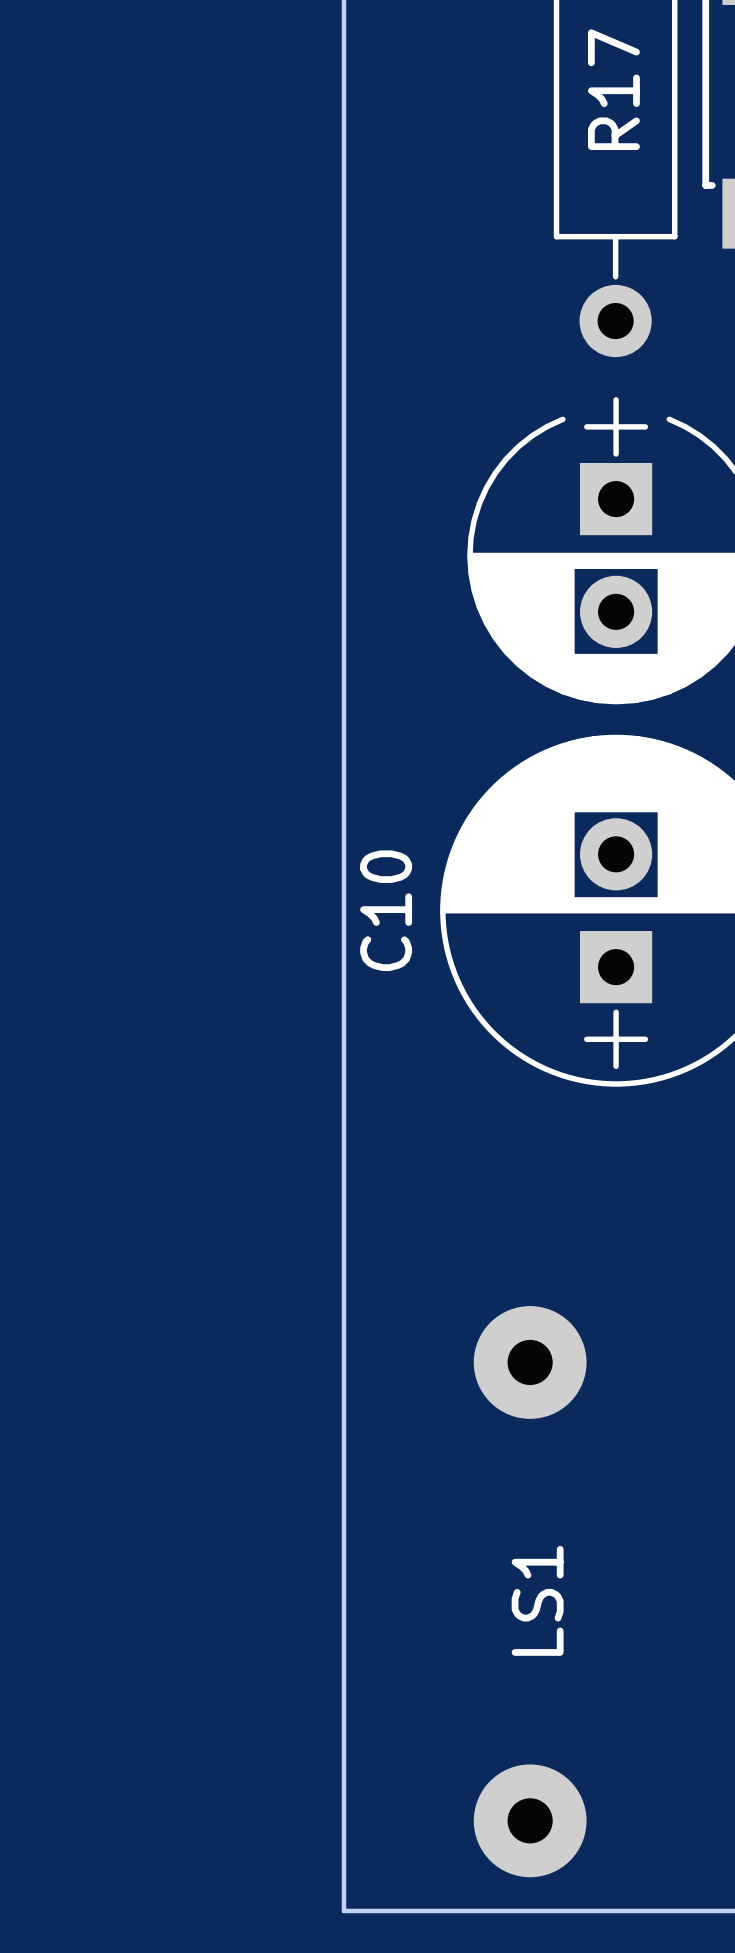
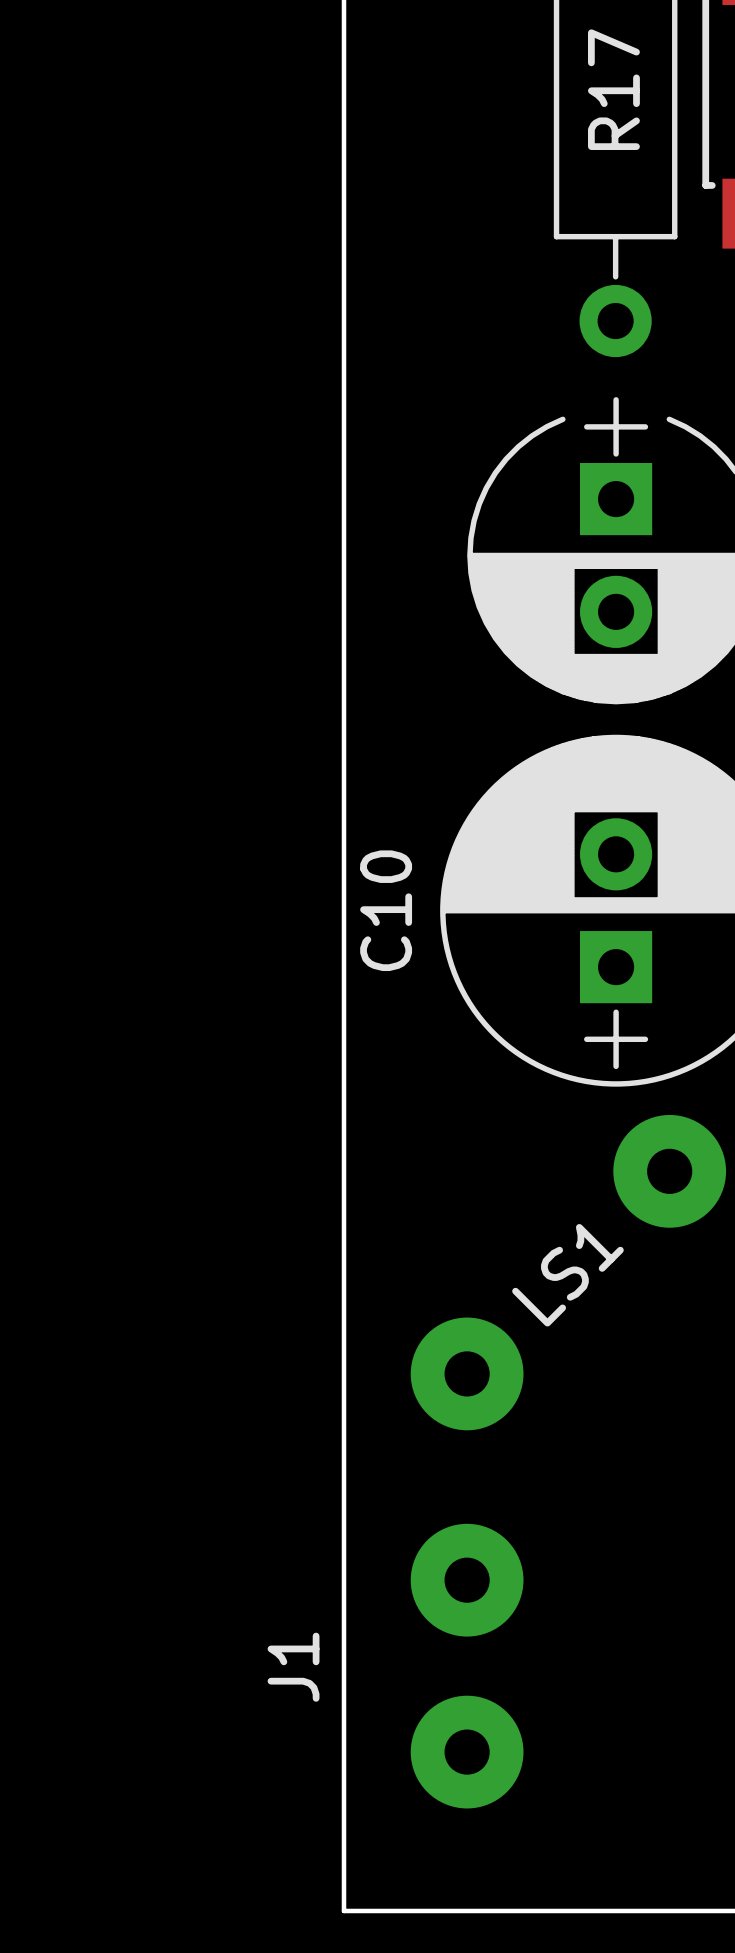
LS1 footprint: [473, 1306, 587, 1878] -> [410, 1114, 727, 1431]
J1: none -> (467, 1666)

